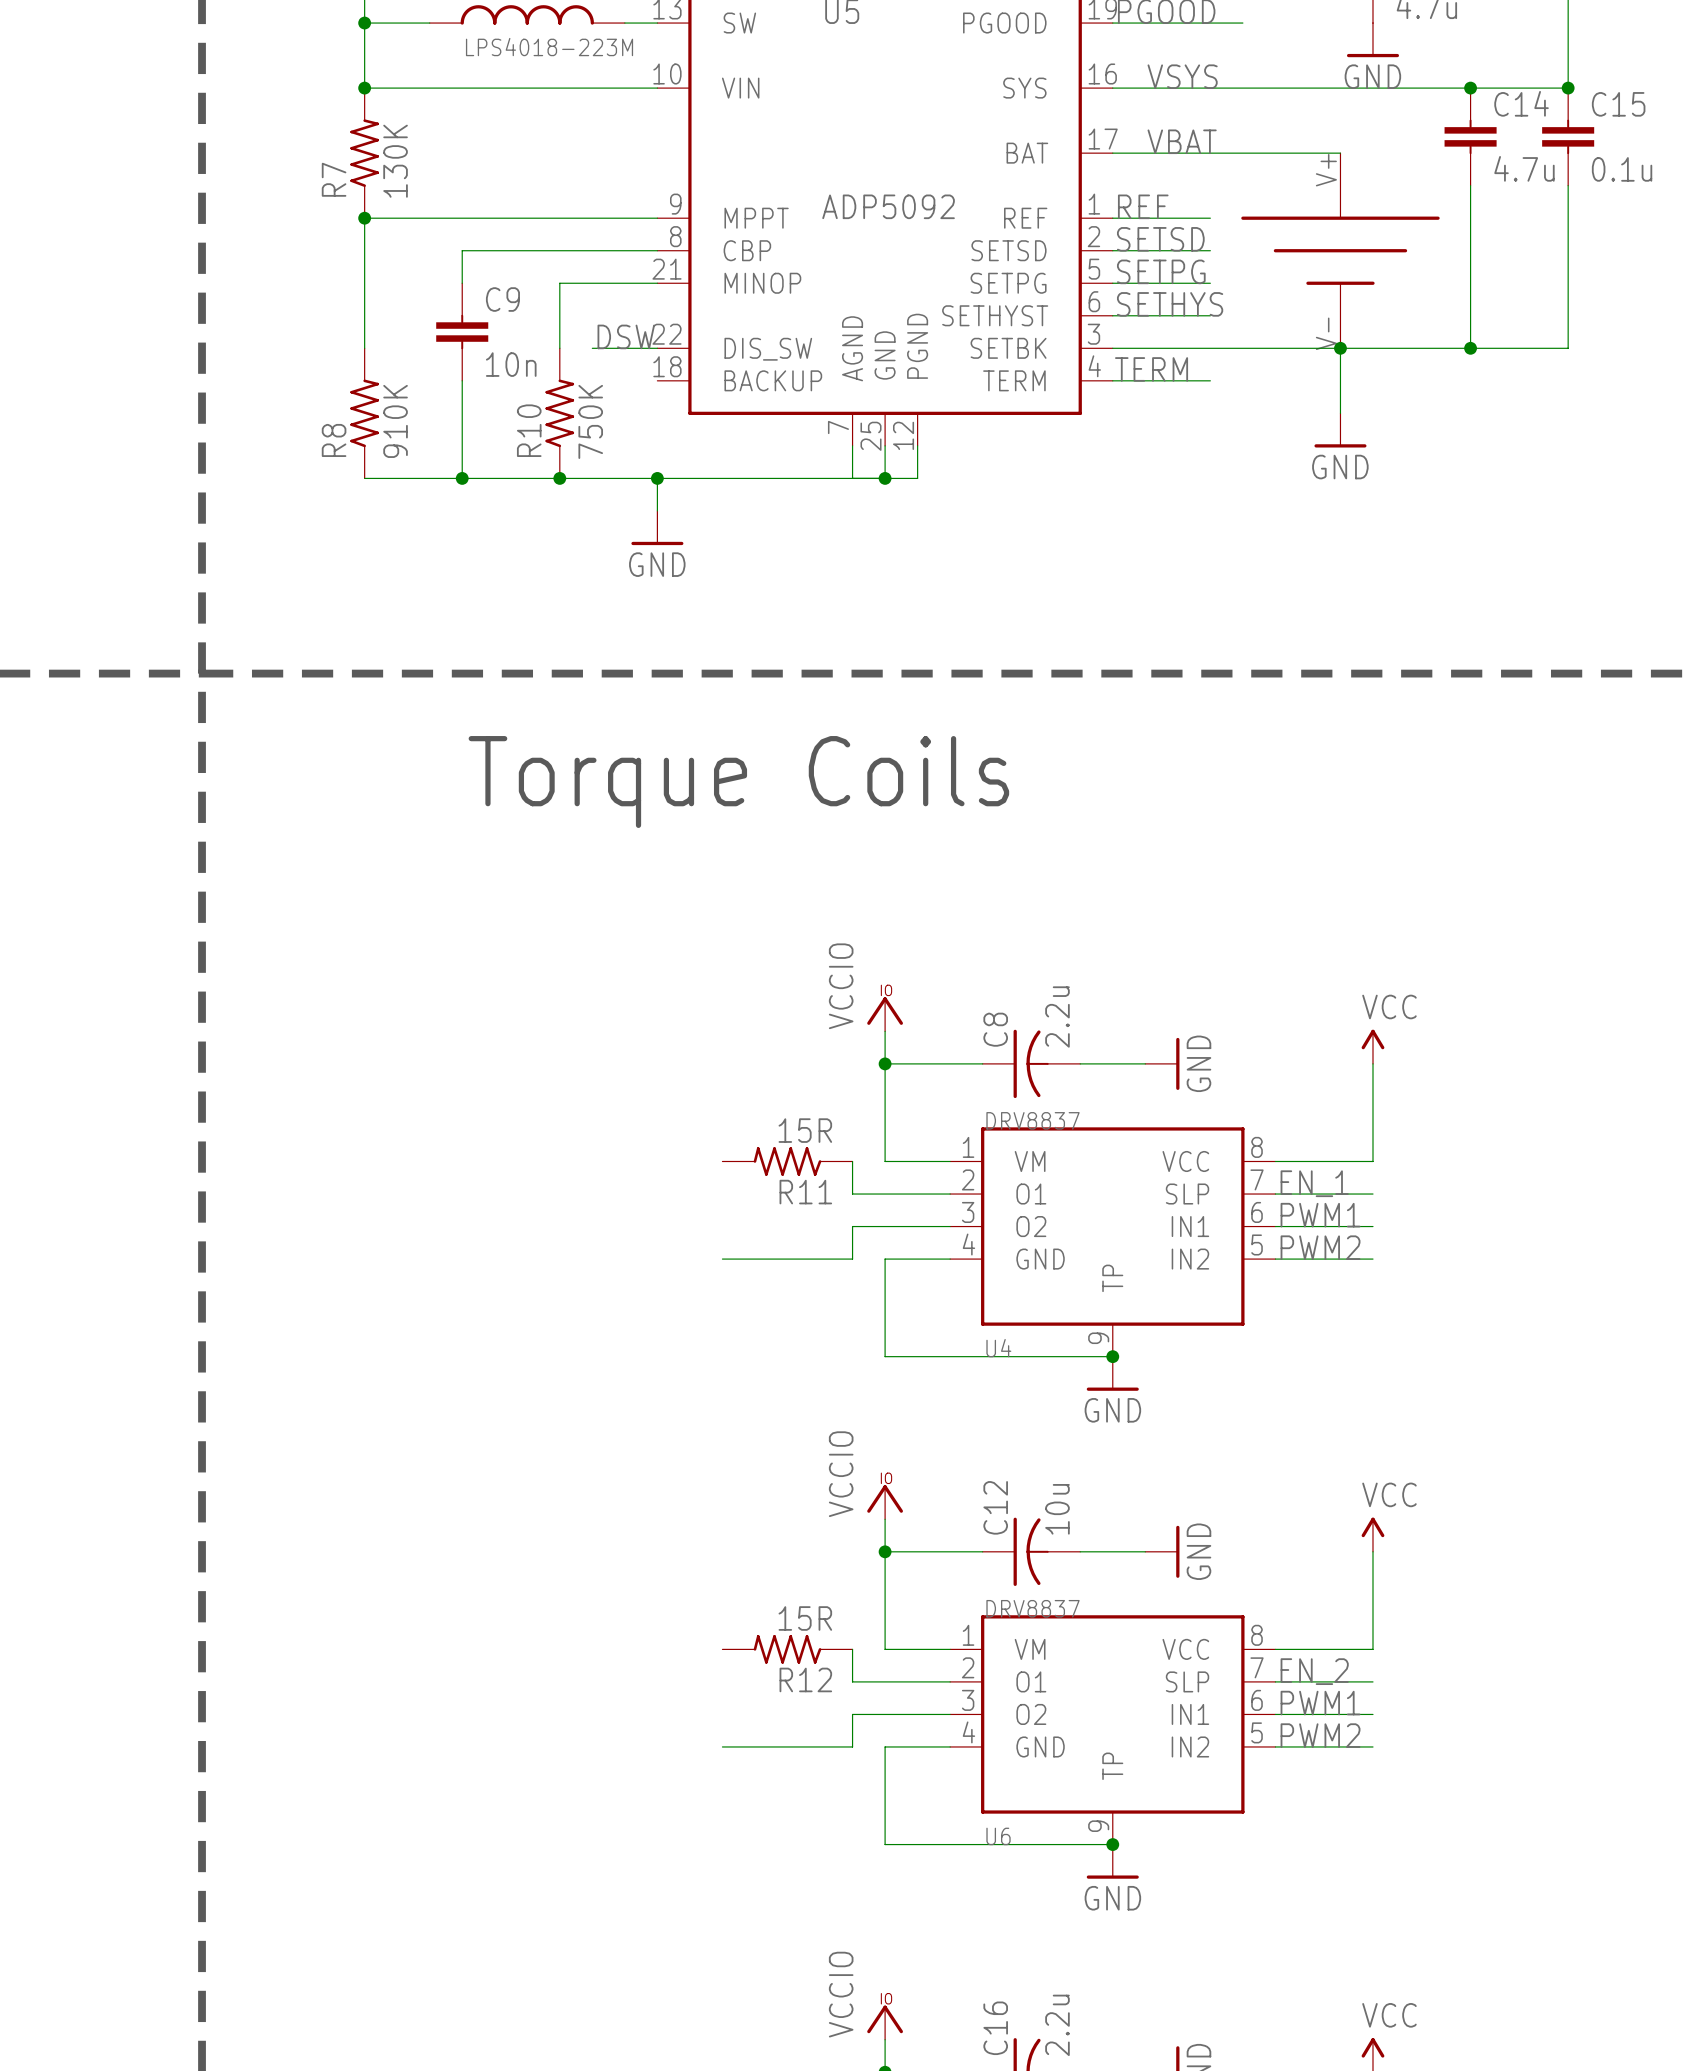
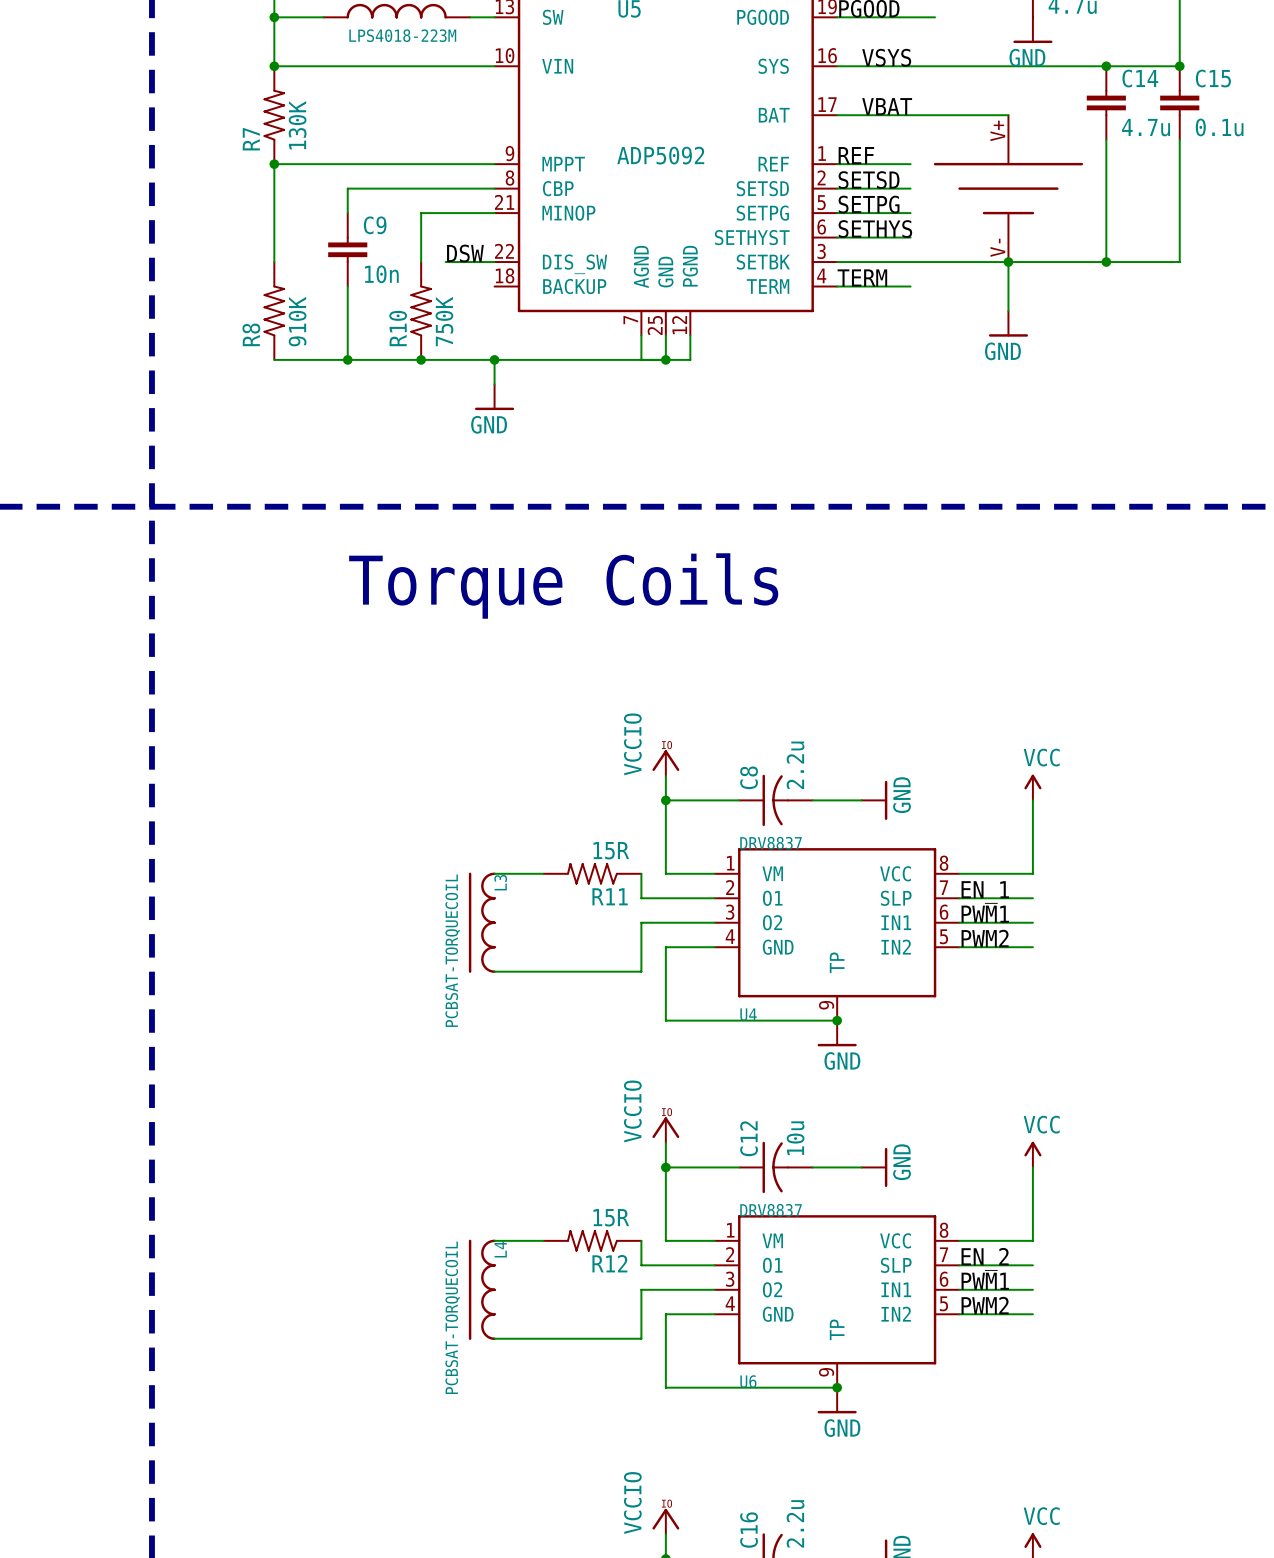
wire: none -> (494, 873) (543, 873)
L3: none -> PCBSAT-TORQUECOIL (482, 922)
wire: (722, 1259) (852, 1259) -> (494, 971) (641, 971) (641, 947)
wire: none -> (494, 1240) (543, 1240)
L4: none -> PCBSAT-TORQUECOIL (482, 1289)
wire: (722, 1746) (852, 1746) -> (494, 1338) (641, 1338) (641, 1314)

